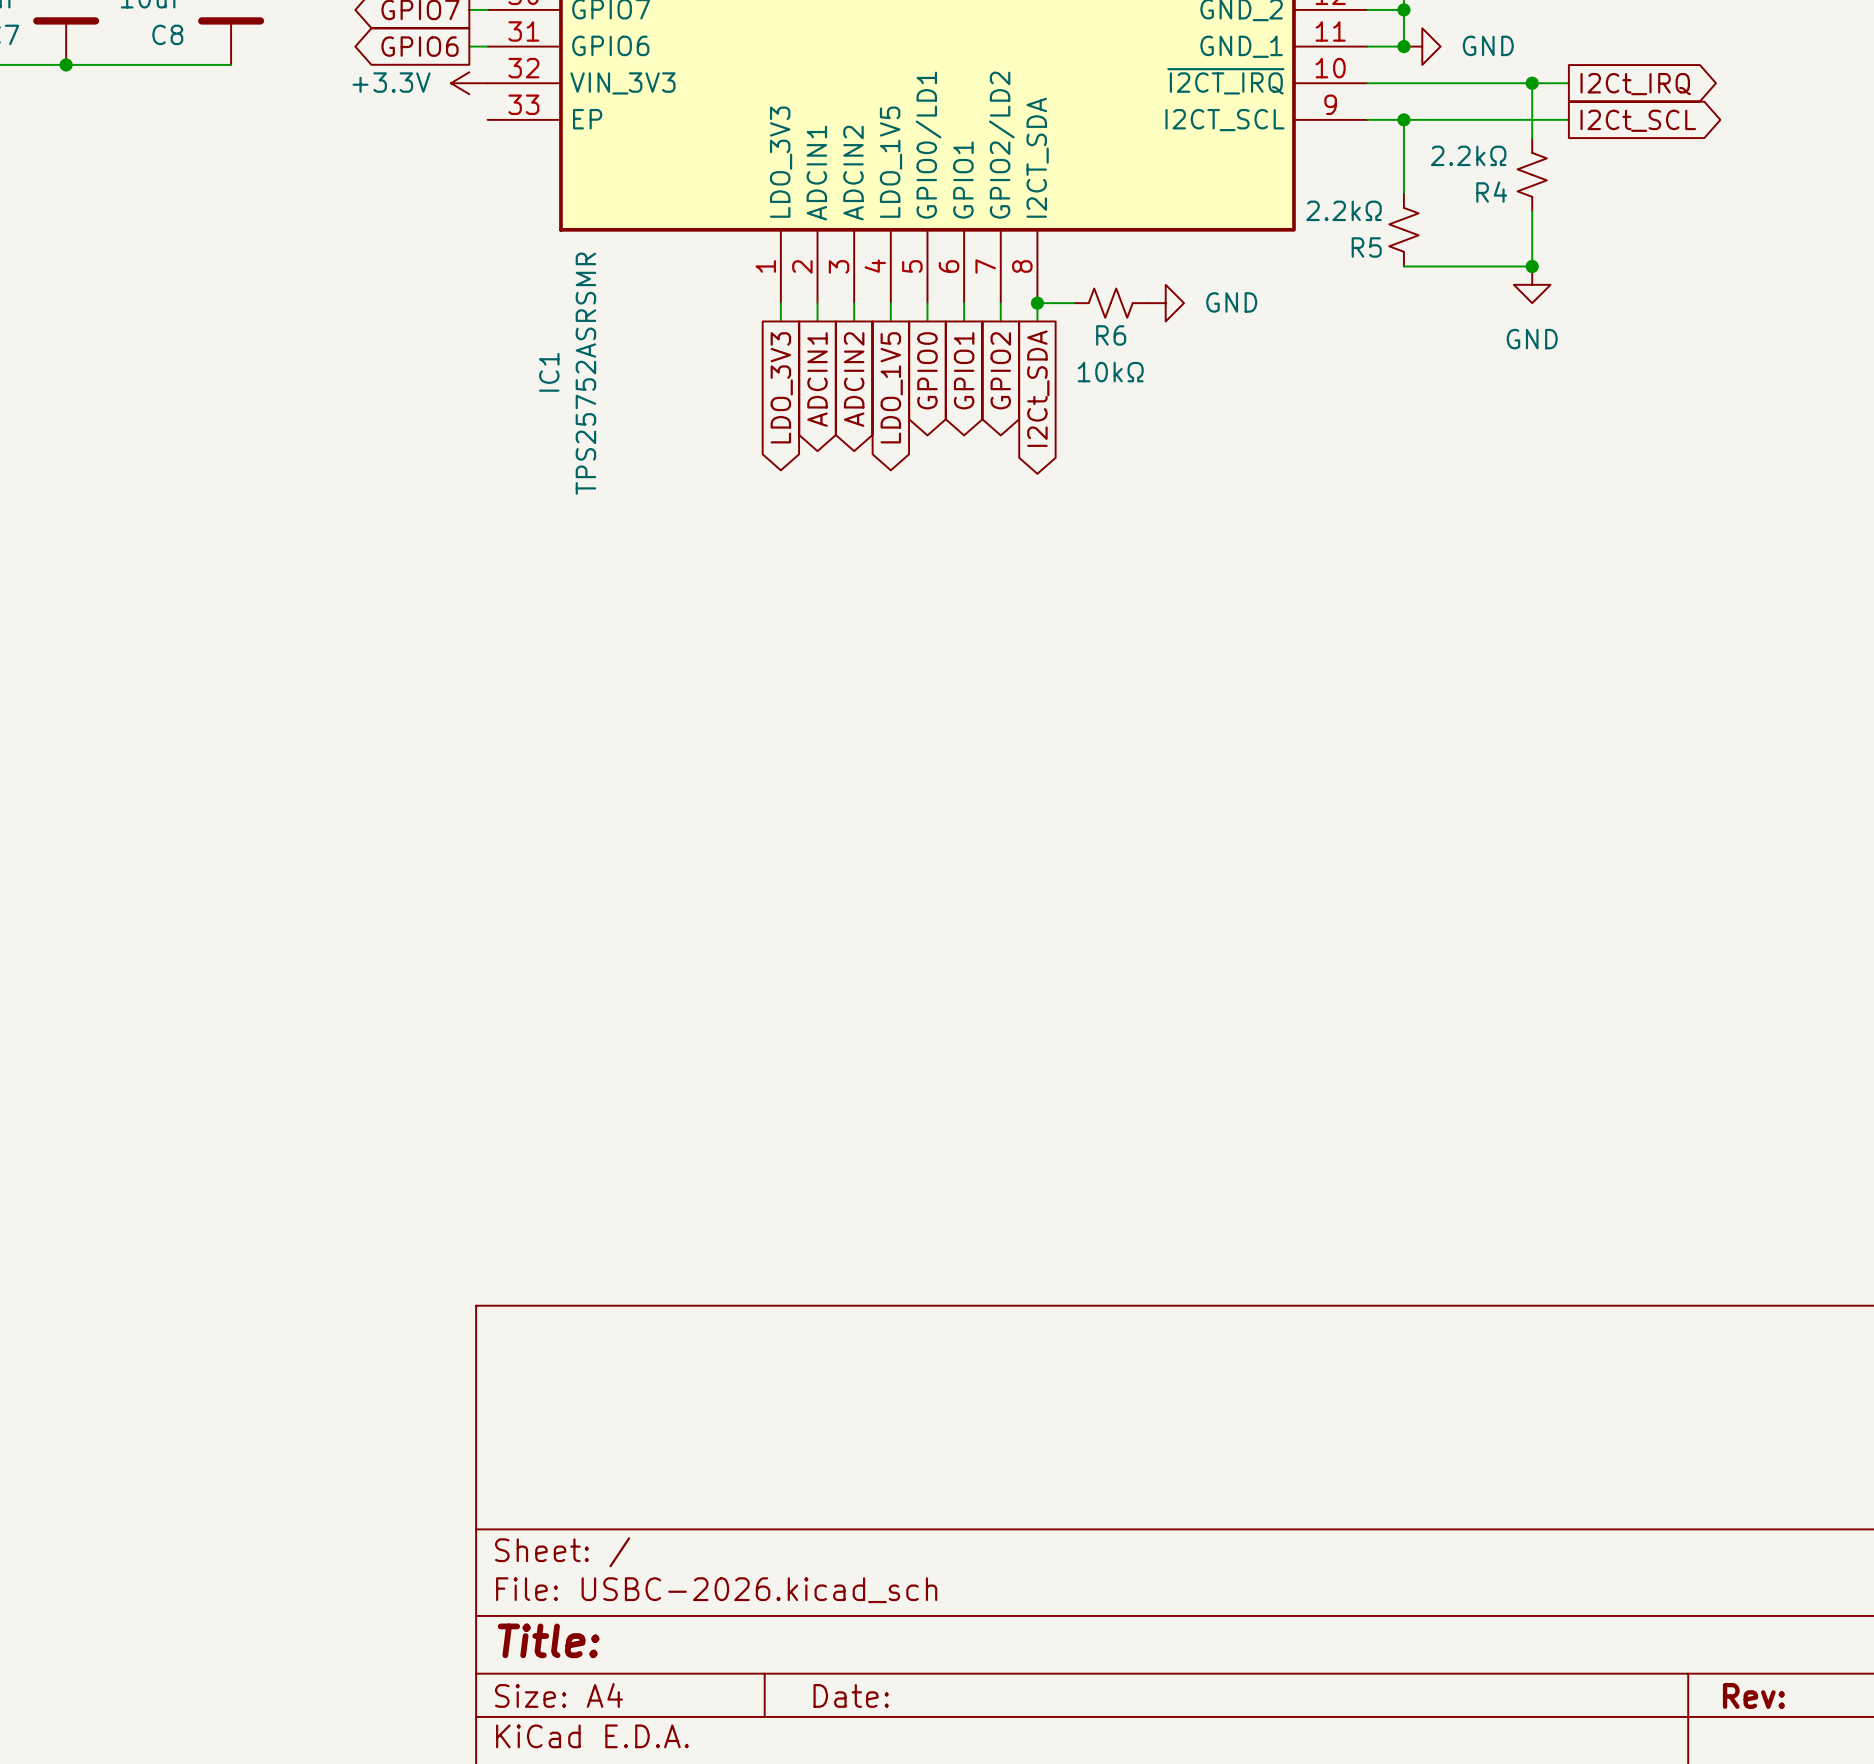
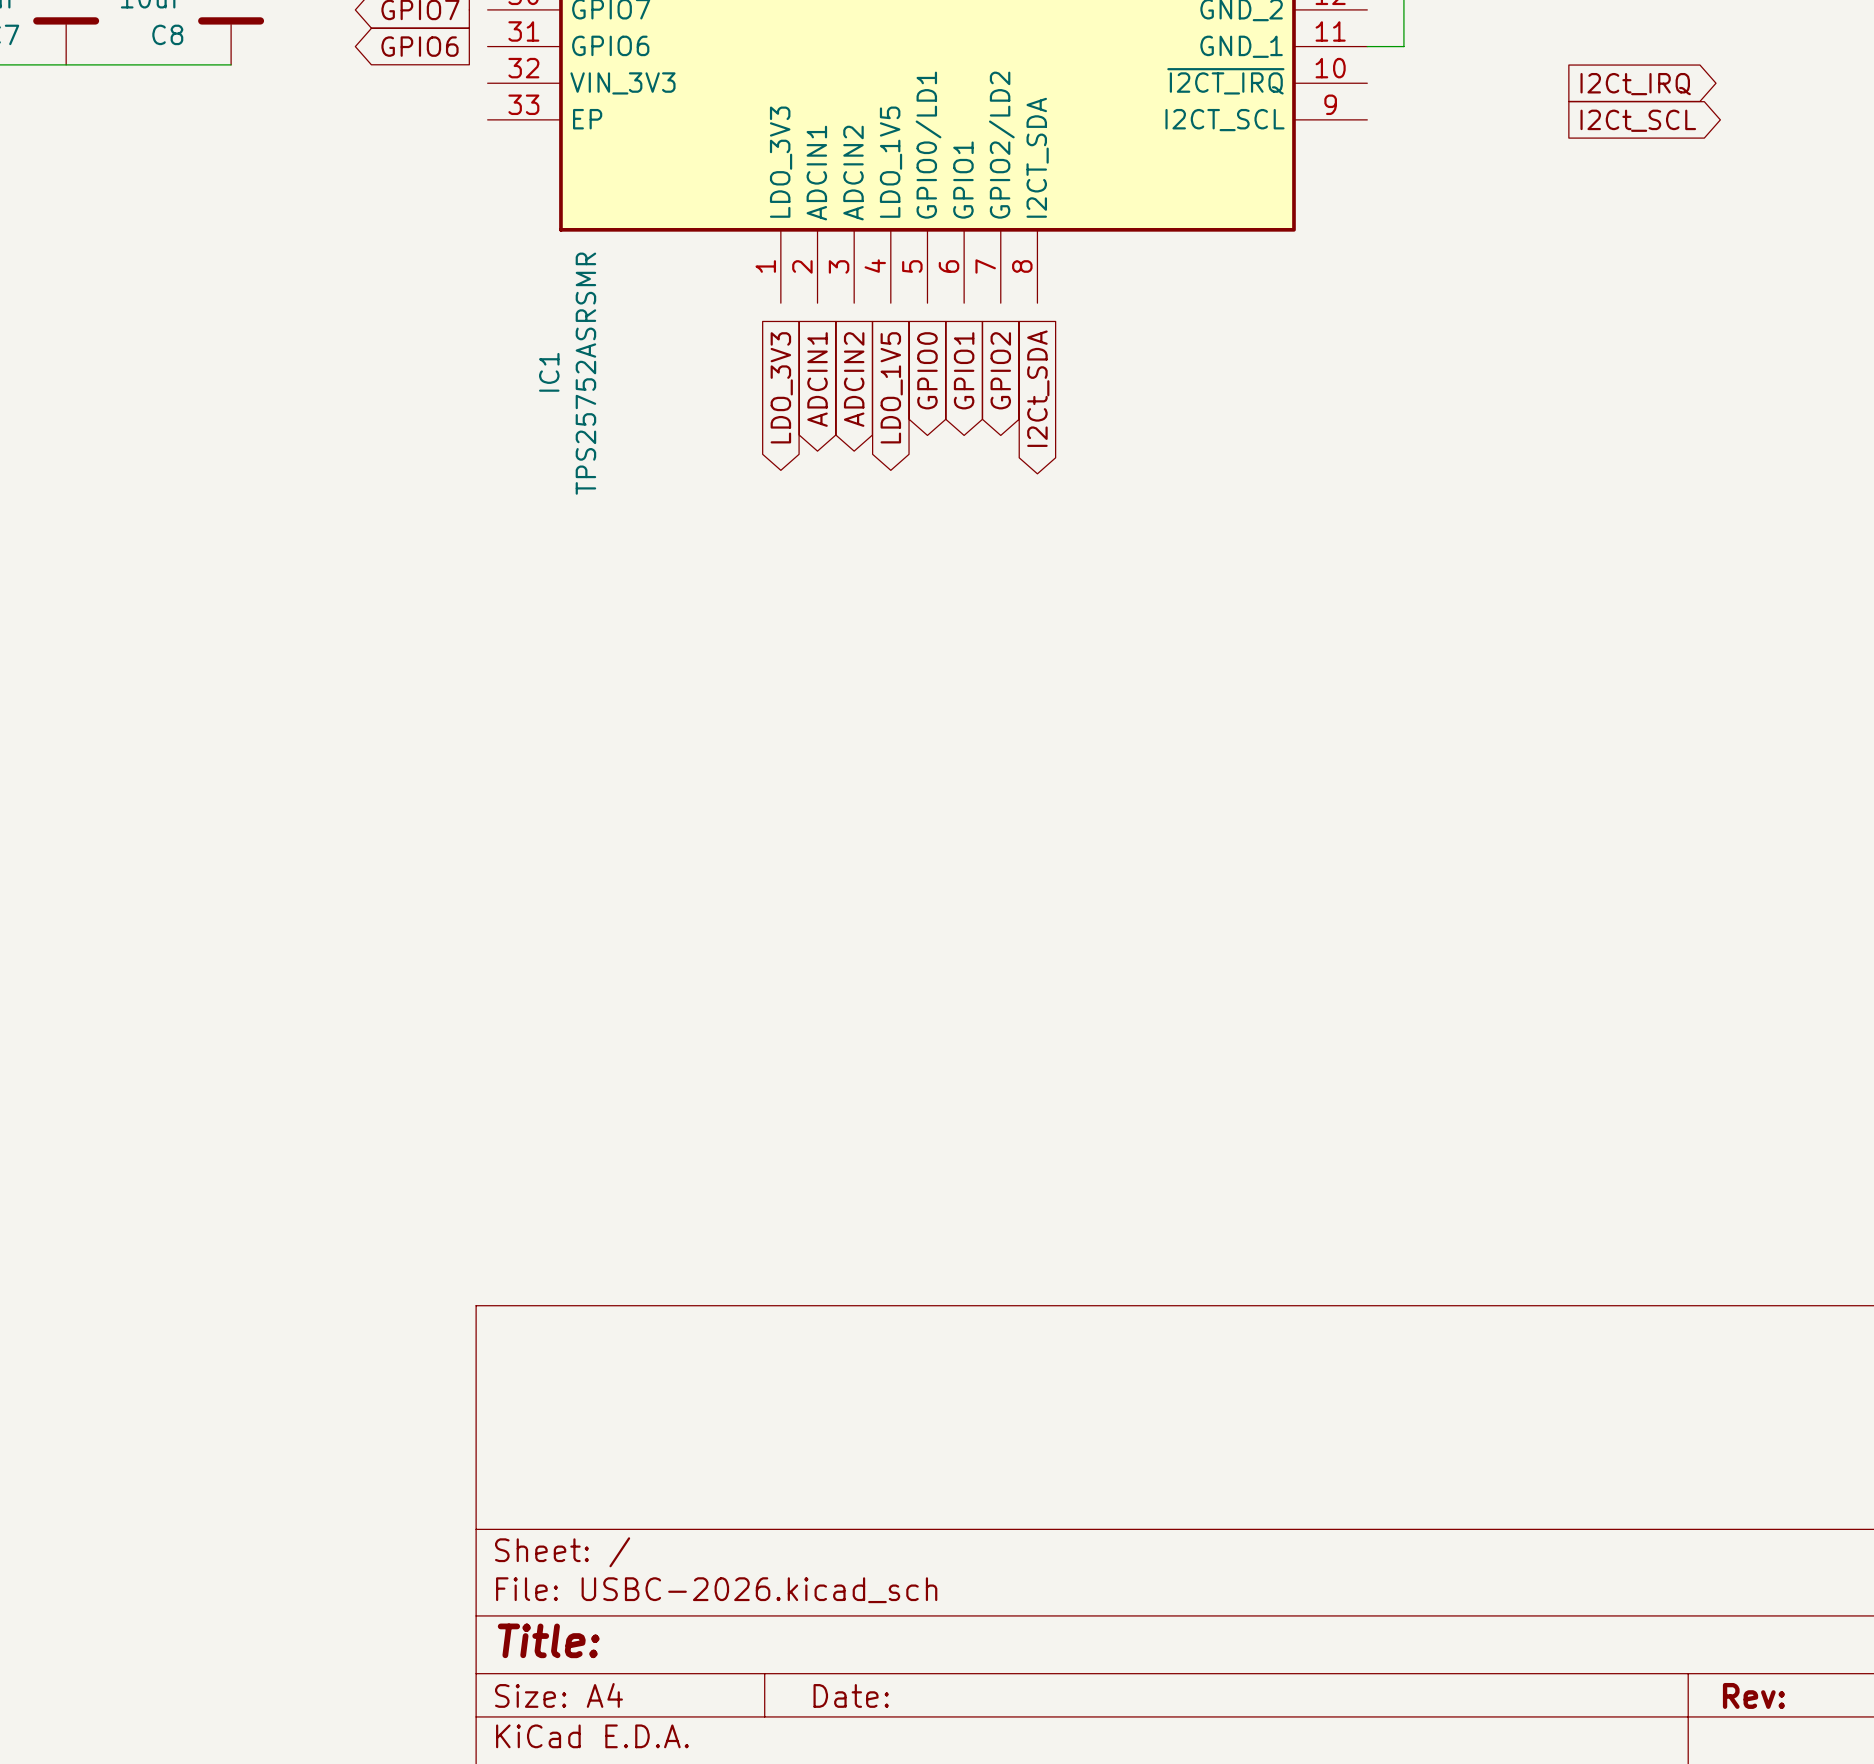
wire: (469, 9) (487, 9) -> none
wire: (1367, 9) (1403, 9) -> none
junction: (1403, 9) -> none
wire: (469, 46) (487, 46) -> none
junction: (1403, 46) -> none
power symbol: GND (1422, 46) -> none
junction: (66, 64) -> none
power symbol: +3.3V (469, 83) -> none
wire: (1367, 83) (1568, 83) -> none
wire: (1532, 83) (1532, 138) -> none
junction: (1532, 83) -> none
wire: (1367, 119) (1568, 119) -> none
wire: (1403, 119) (1403, 193) -> none
junction: (1403, 119) -> none
R4: 2.2kΩ (1532, 174) -> none
wire: (1532, 211) (1532, 266) (1403, 266) -> none
R5: 2.2kΩ (1403, 229) -> none
junction: (1532, 266) -> none
power symbol: GND (1532, 284) -> none
wire: (780, 303) (780, 321) -> none
wire: (817, 303) (817, 321) -> none
wire: (854, 303) (854, 321) -> none
wire: (890, 303) (890, 321) -> none
wire: (927, 303) (927, 321) -> none
wire: (964, 303) (964, 321) -> none
wire: (1000, 303) (1000, 321) -> none
junction: (1037, 303) -> none
wire: (1074, 303) (1037, 303) (1037, 321) -> none
R6: 10kΩ (1110, 303) -> none
power symbol: GND (1165, 303) -> none

